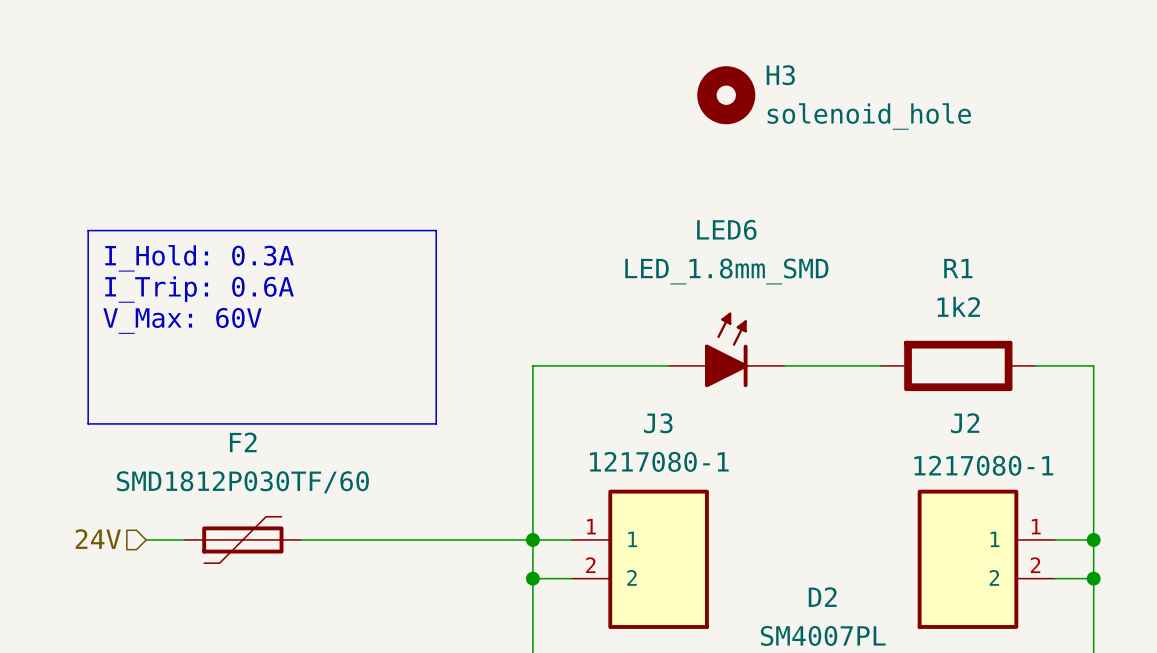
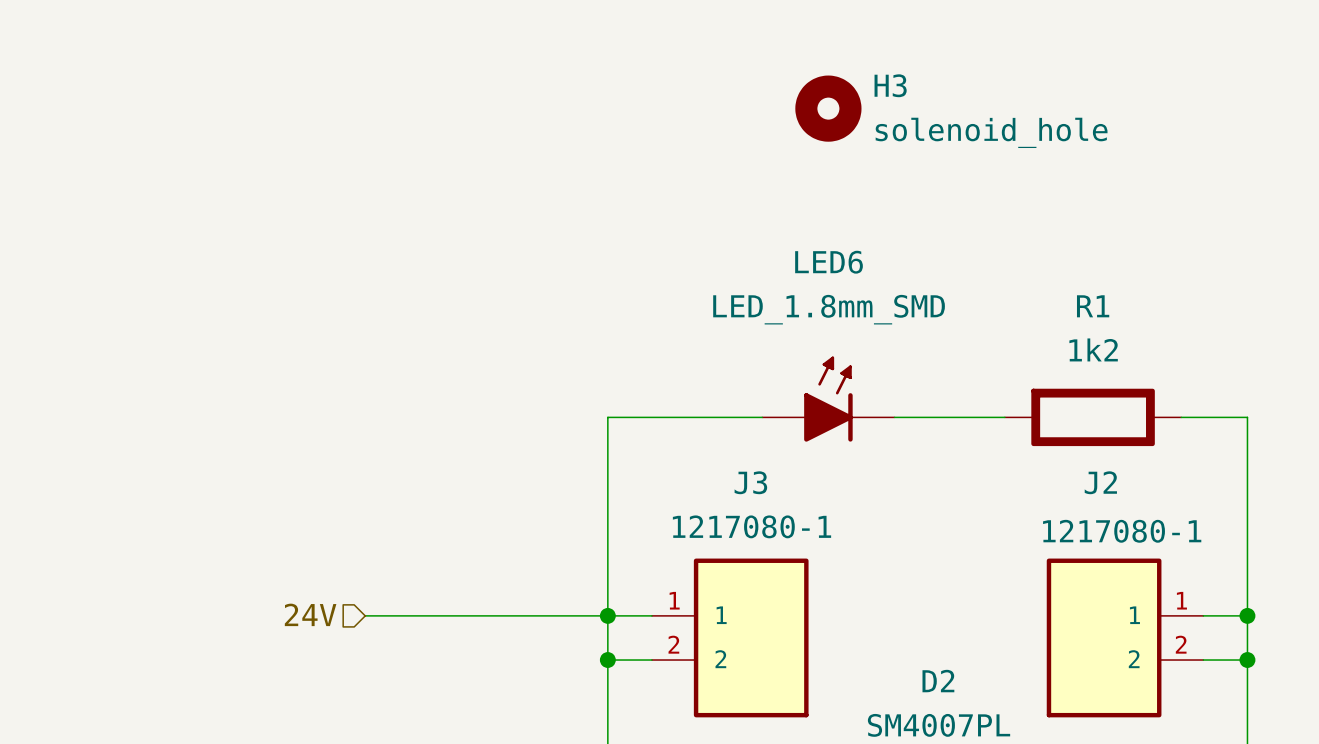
line: (88, 230) (436, 230) (436, 423) (88, 423) (88, 230) -> none
text: I_Hold: 0.3A (199, 258) -> none
text: I_Trip: 0.6A (199, 289) -> none
text: V_Max: 60V (182, 320) -> none
hierarchical label position: 24V (98, 539) -> 24V (310, 614)
wire: (146, 539) (184, 539) -> none
F2: SMD1812P030TF/60 (242, 539) -> none
wire: (300, 539) (320, 539) -> none

